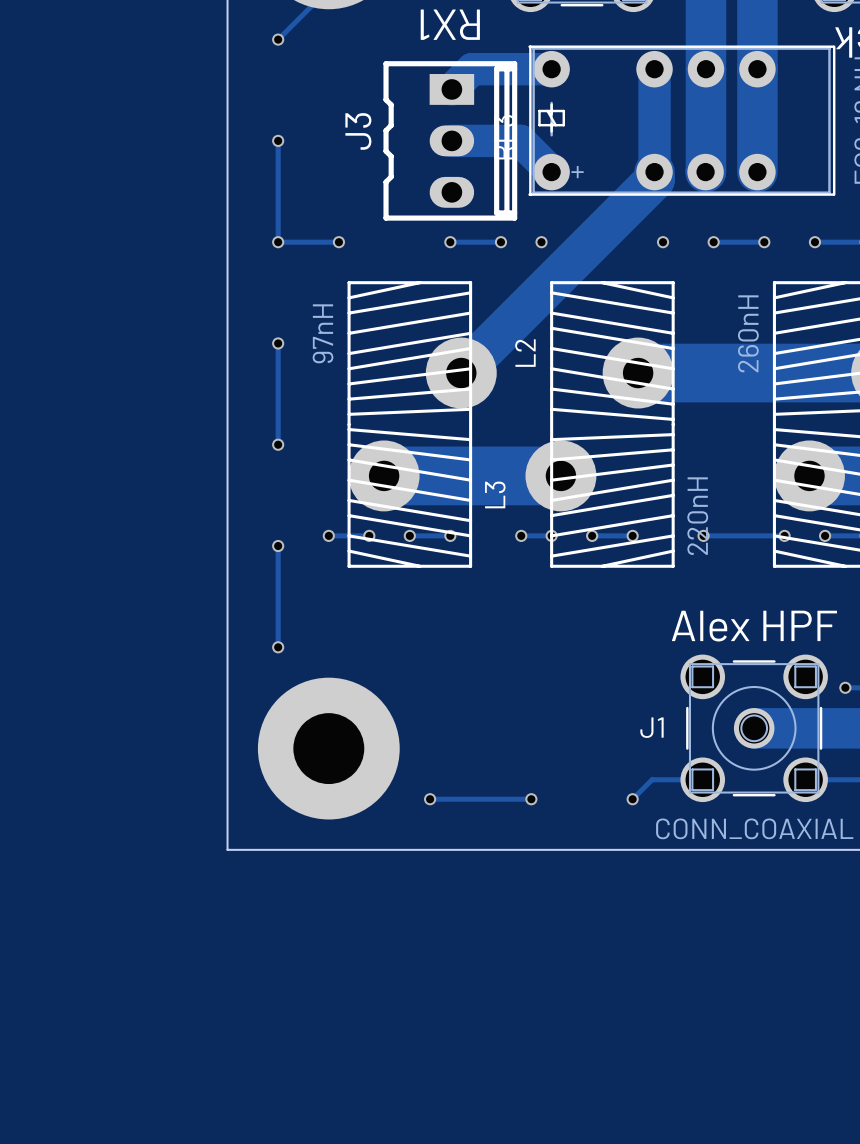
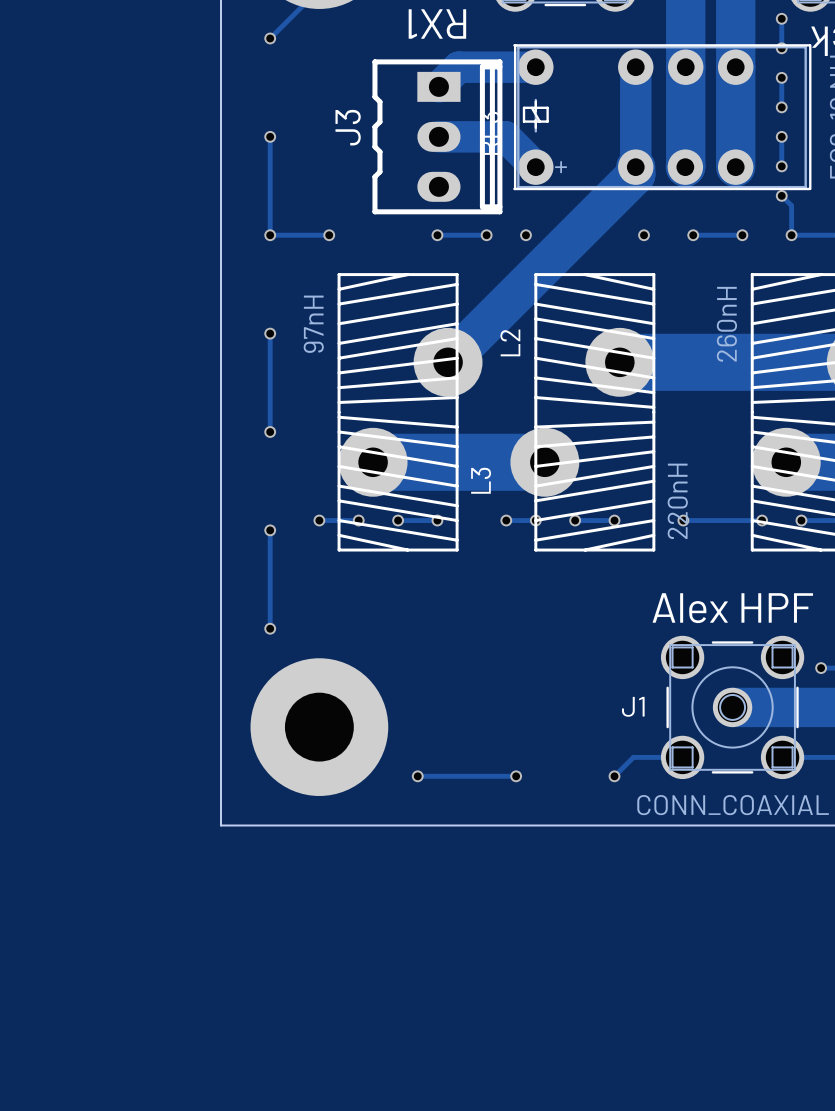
track: none -> (781, 18) (781, 48)
via: none -> (781, 18)
via: none -> (781, 48)
track: none -> (781, 77) (781, 107)
via: none -> (781, 77)
via: none -> (781, 107)
track: none -> (781, 136) (781, 166)
via: none -> (781, 136)
via: none -> (781, 166)
track: none -> (781, 195) (791, 205) (791, 235)
via: none -> (781, 195)

